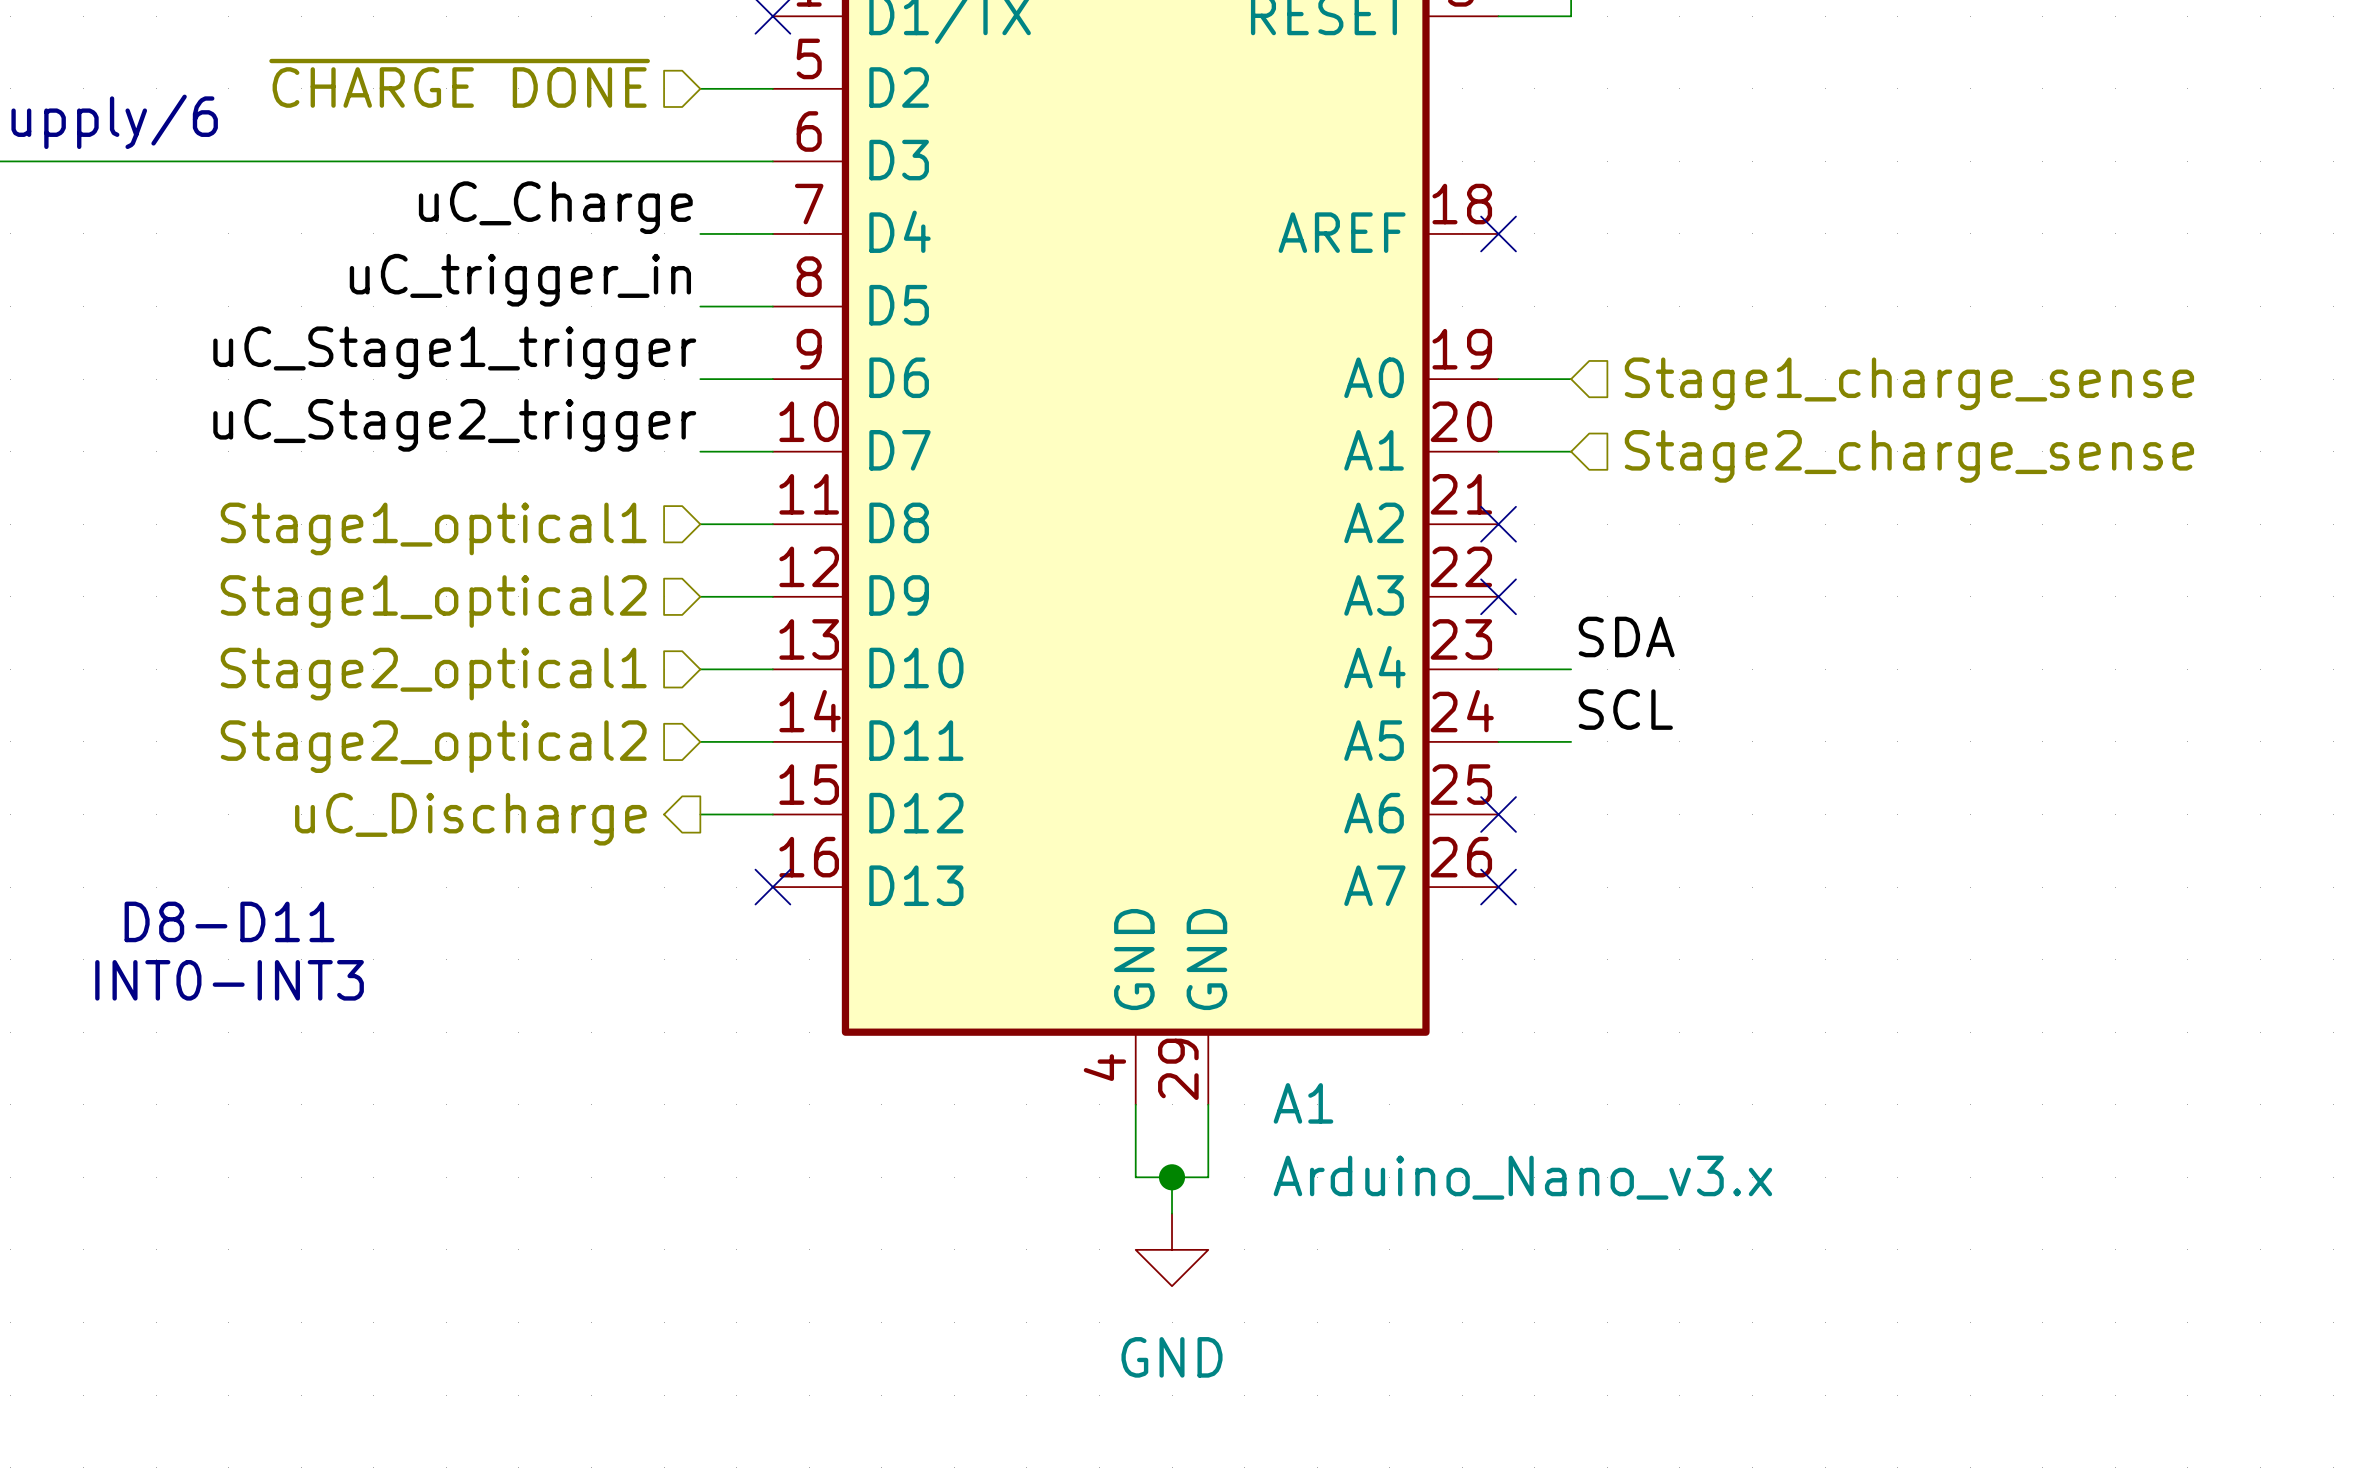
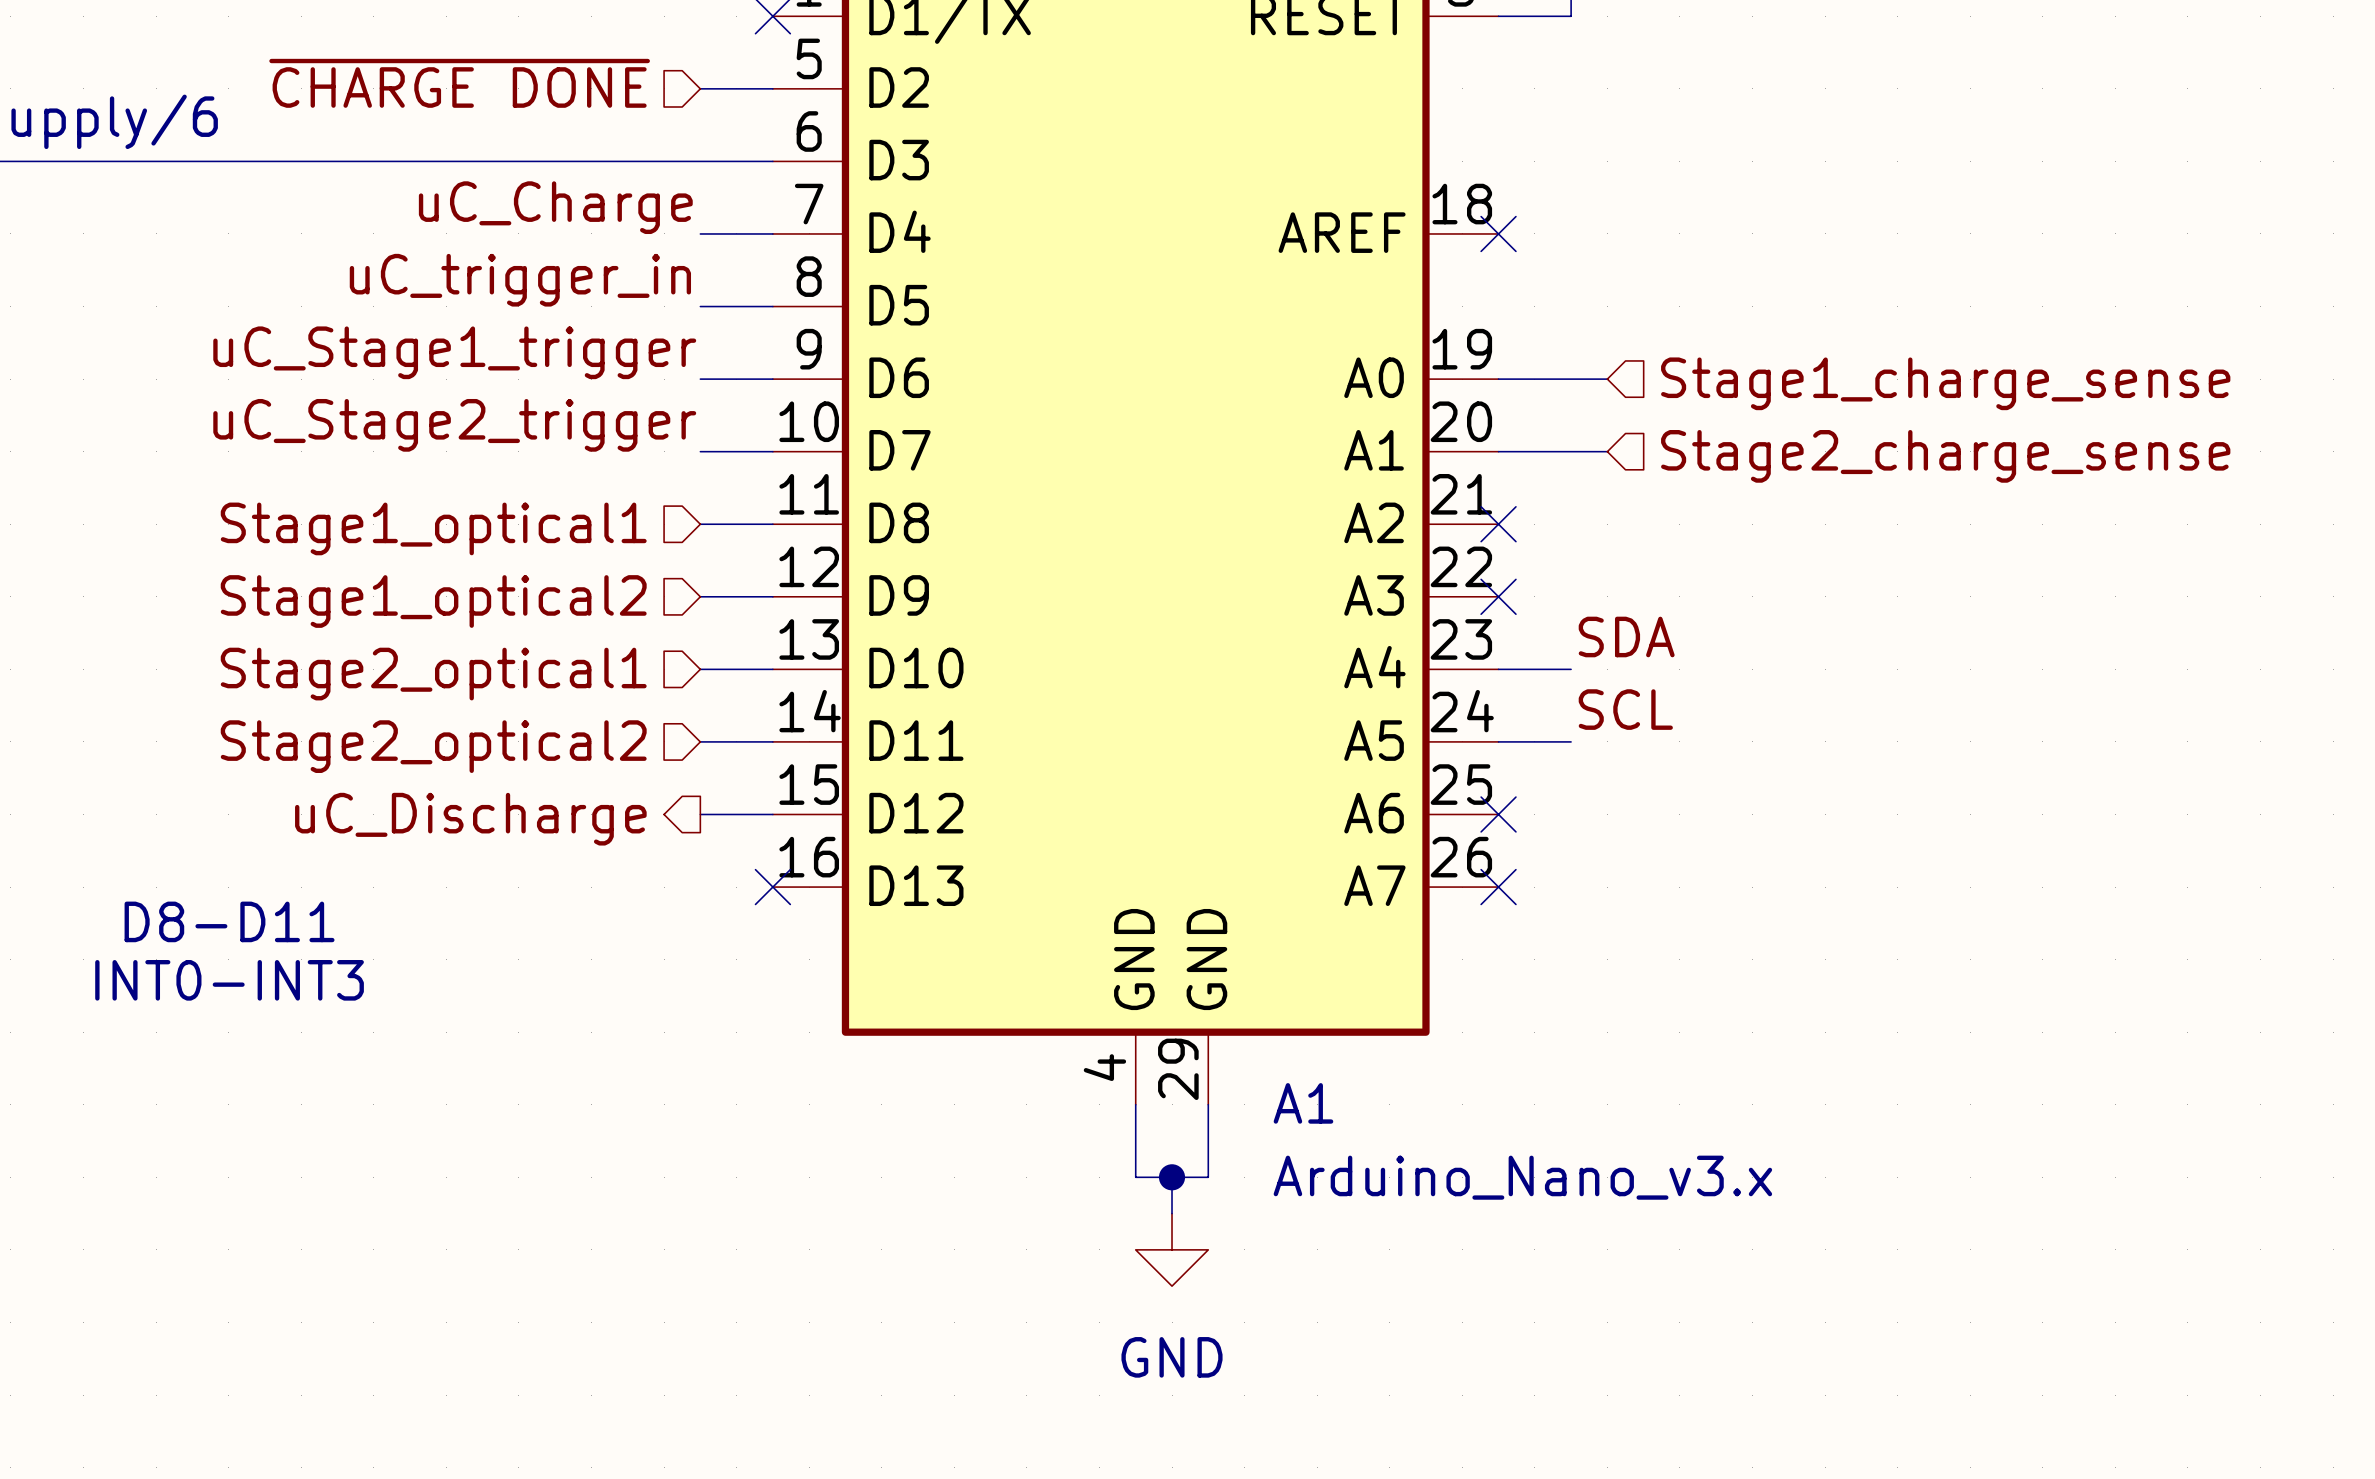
wire: none -> (1571, 379) (1607, 379)
hierarchical label position: Stage1_charge_sense (1909, 383) -> Stage1_charge_sense (1945, 383)
wire: none -> (1571, 451) (1607, 451)
hierarchical label position: Stage2_charge_sense (1909, 456) -> Stage2_charge_sense (1945, 456)

